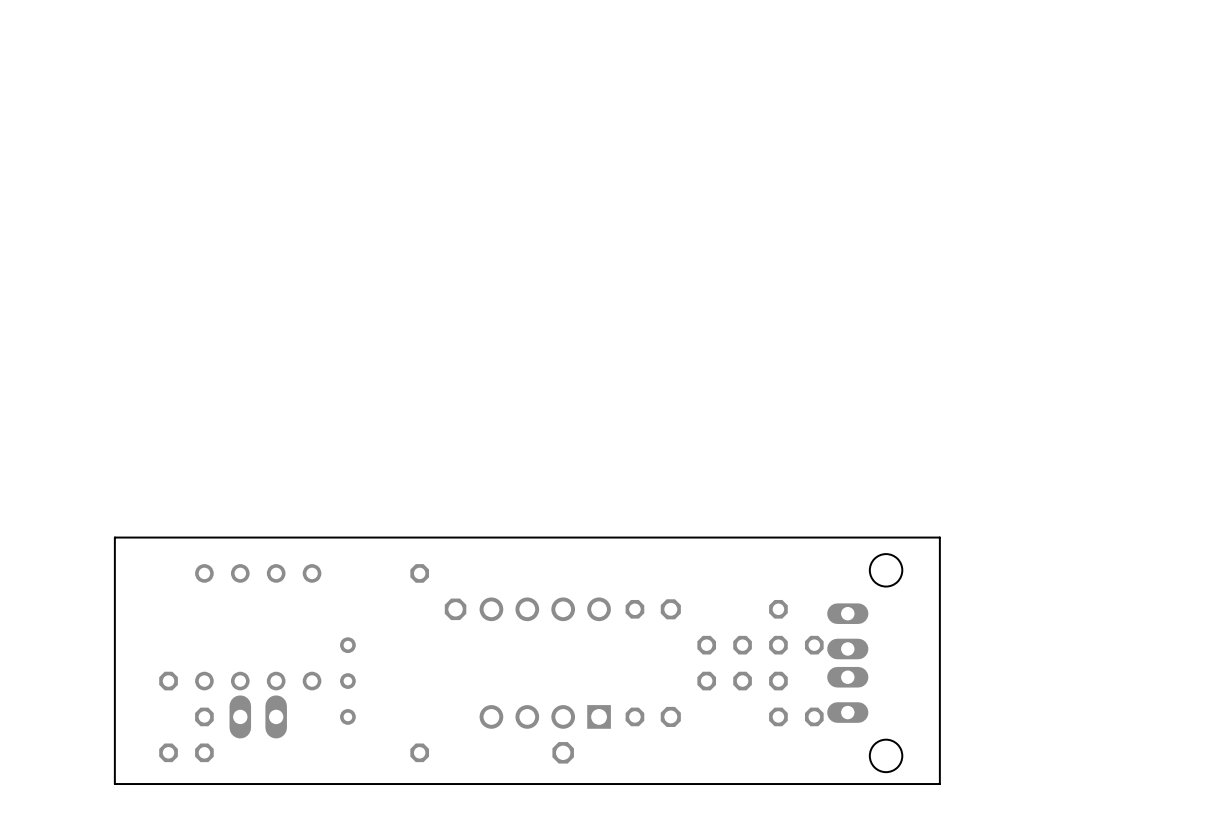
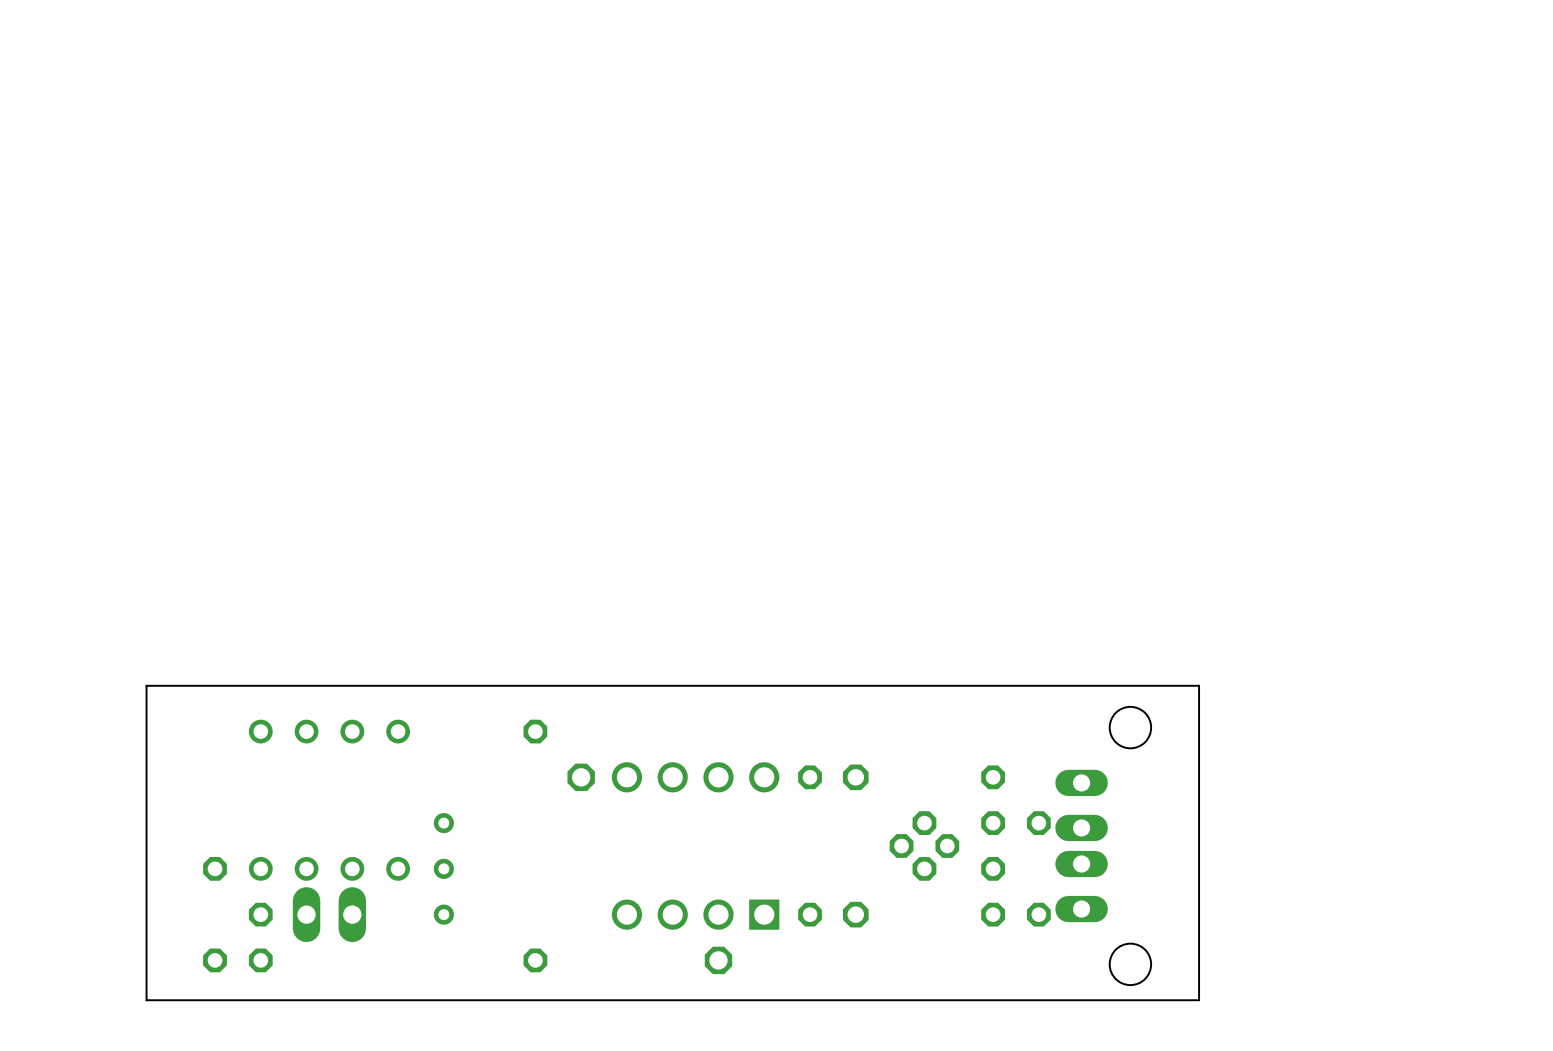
part: (724, 645) -> none
part: none -> (924, 845)
part: none -> (924, 845)
part: (724, 681) -> none

